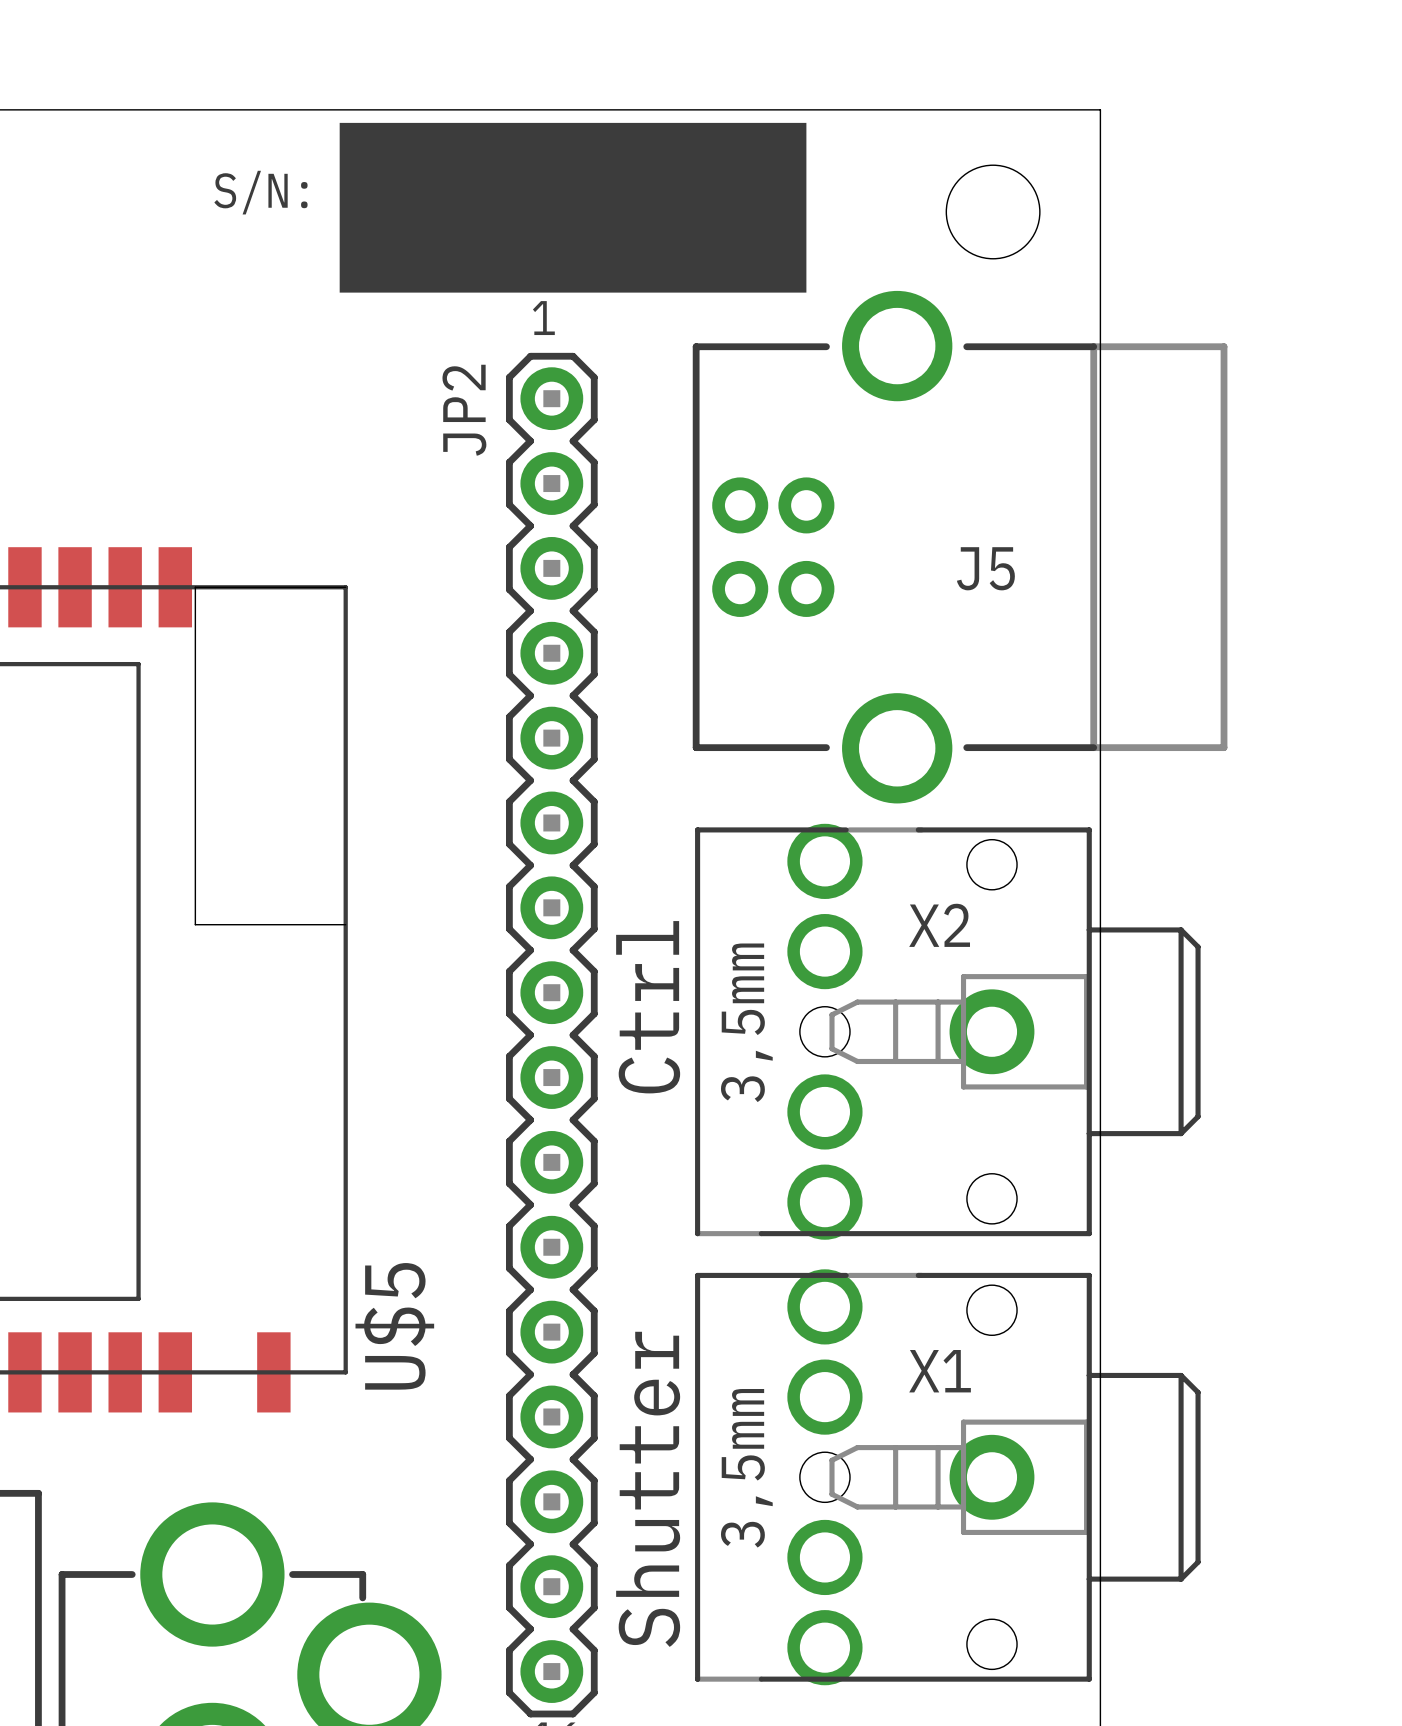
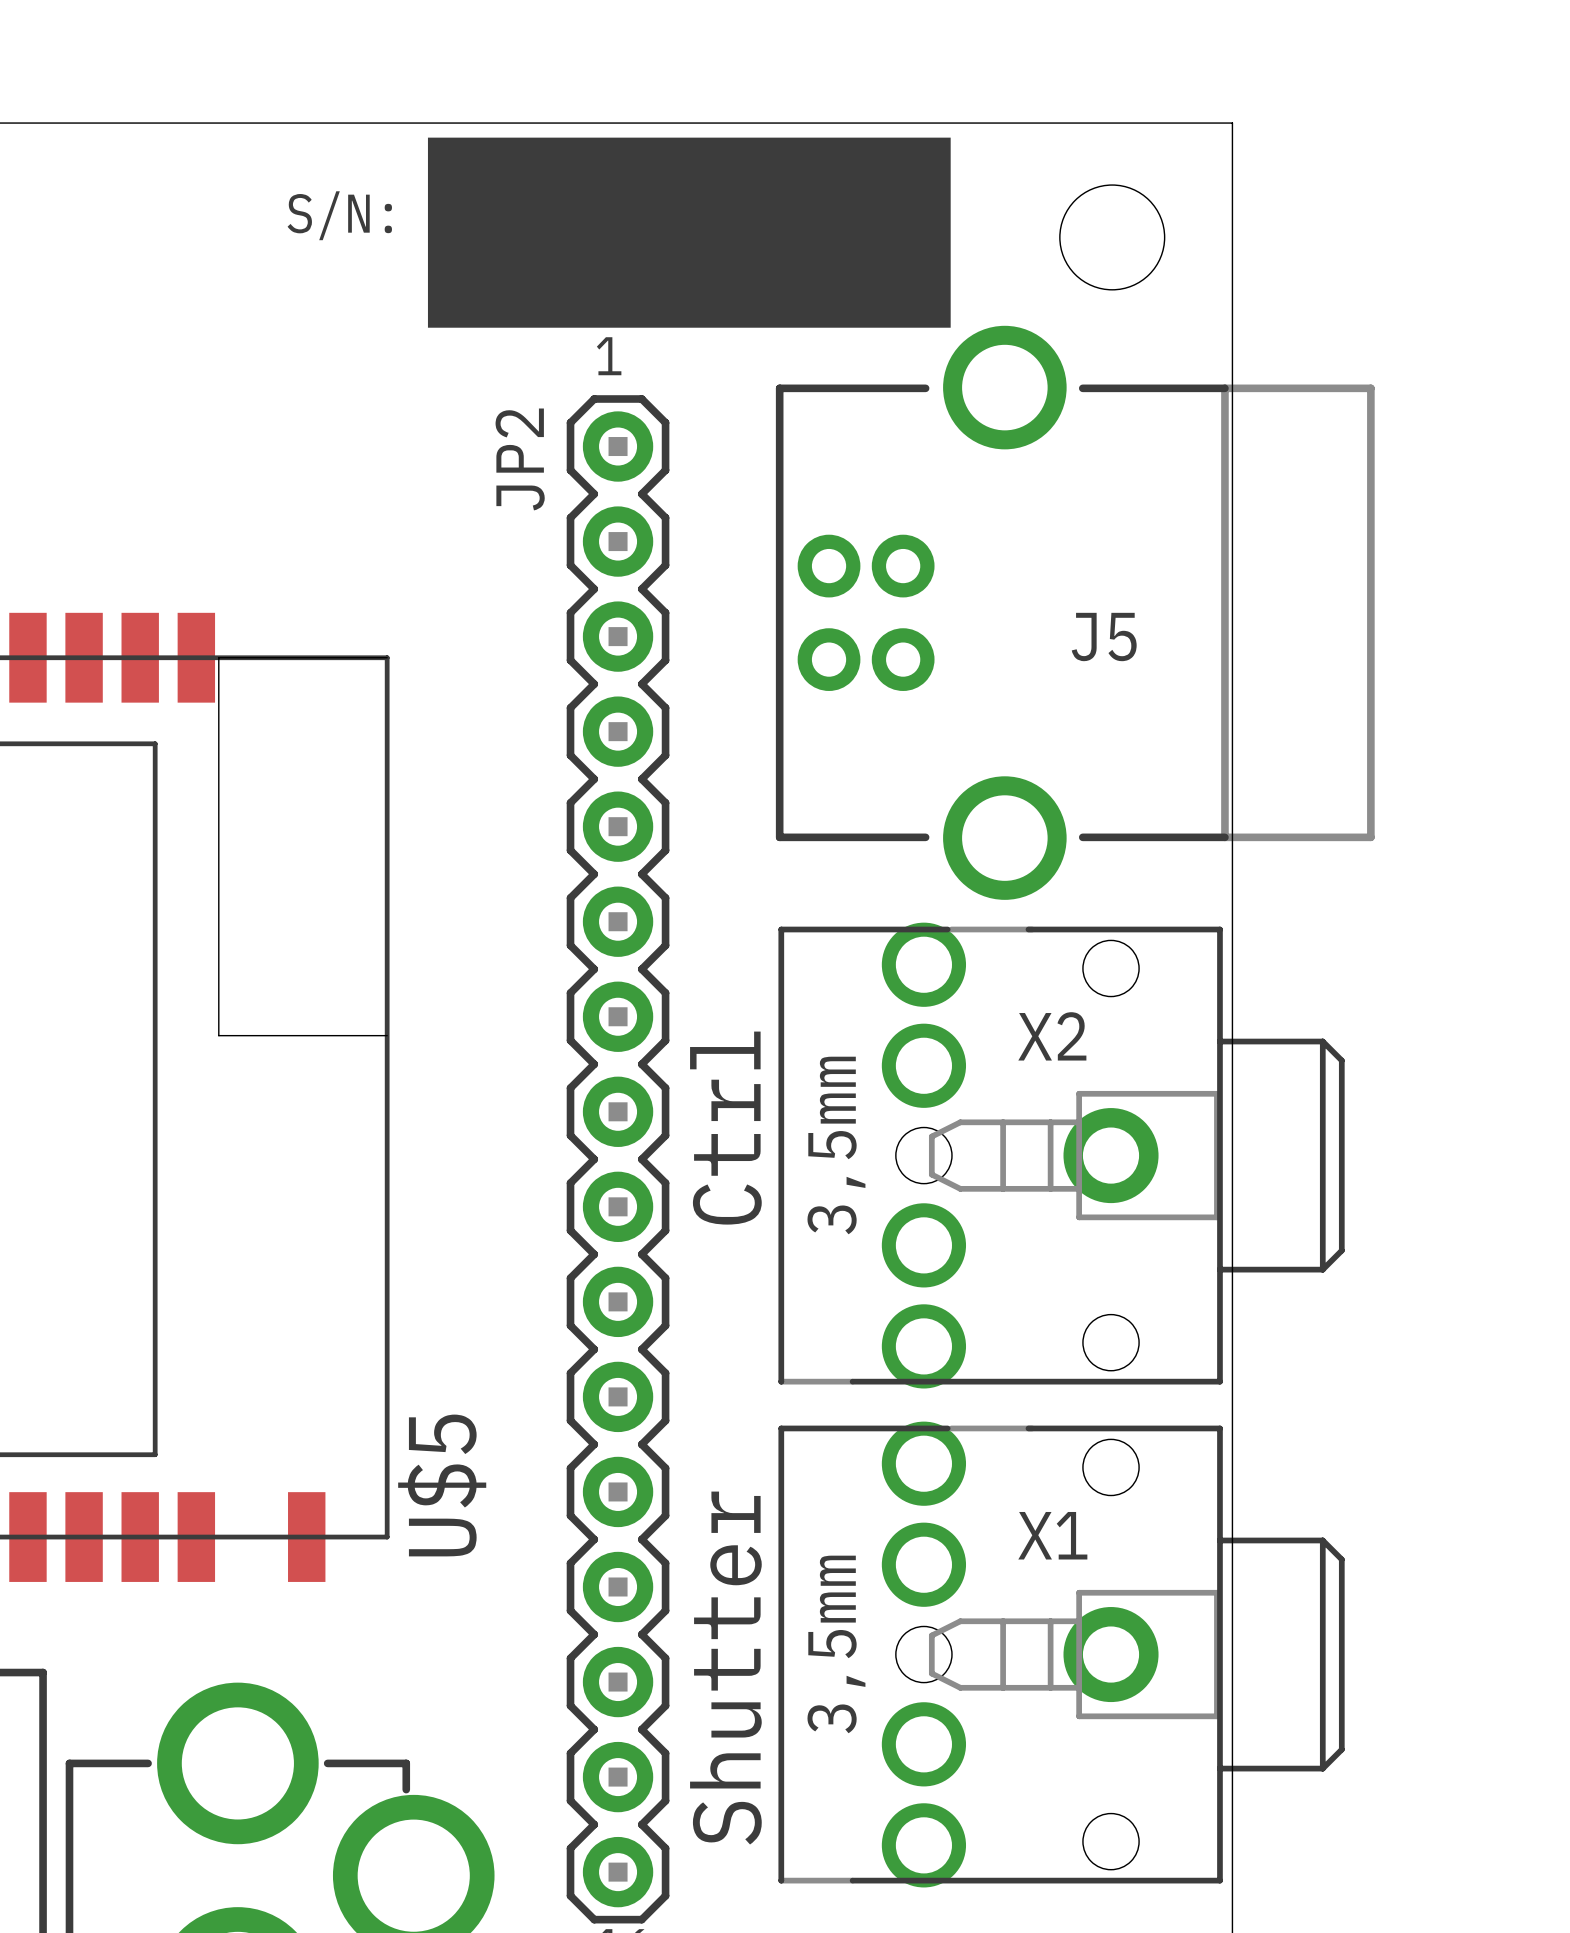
text position: S/N: (260, 192) -> S/N: (339, 215)
drawing position: (573, 207) -> (689, 232)

